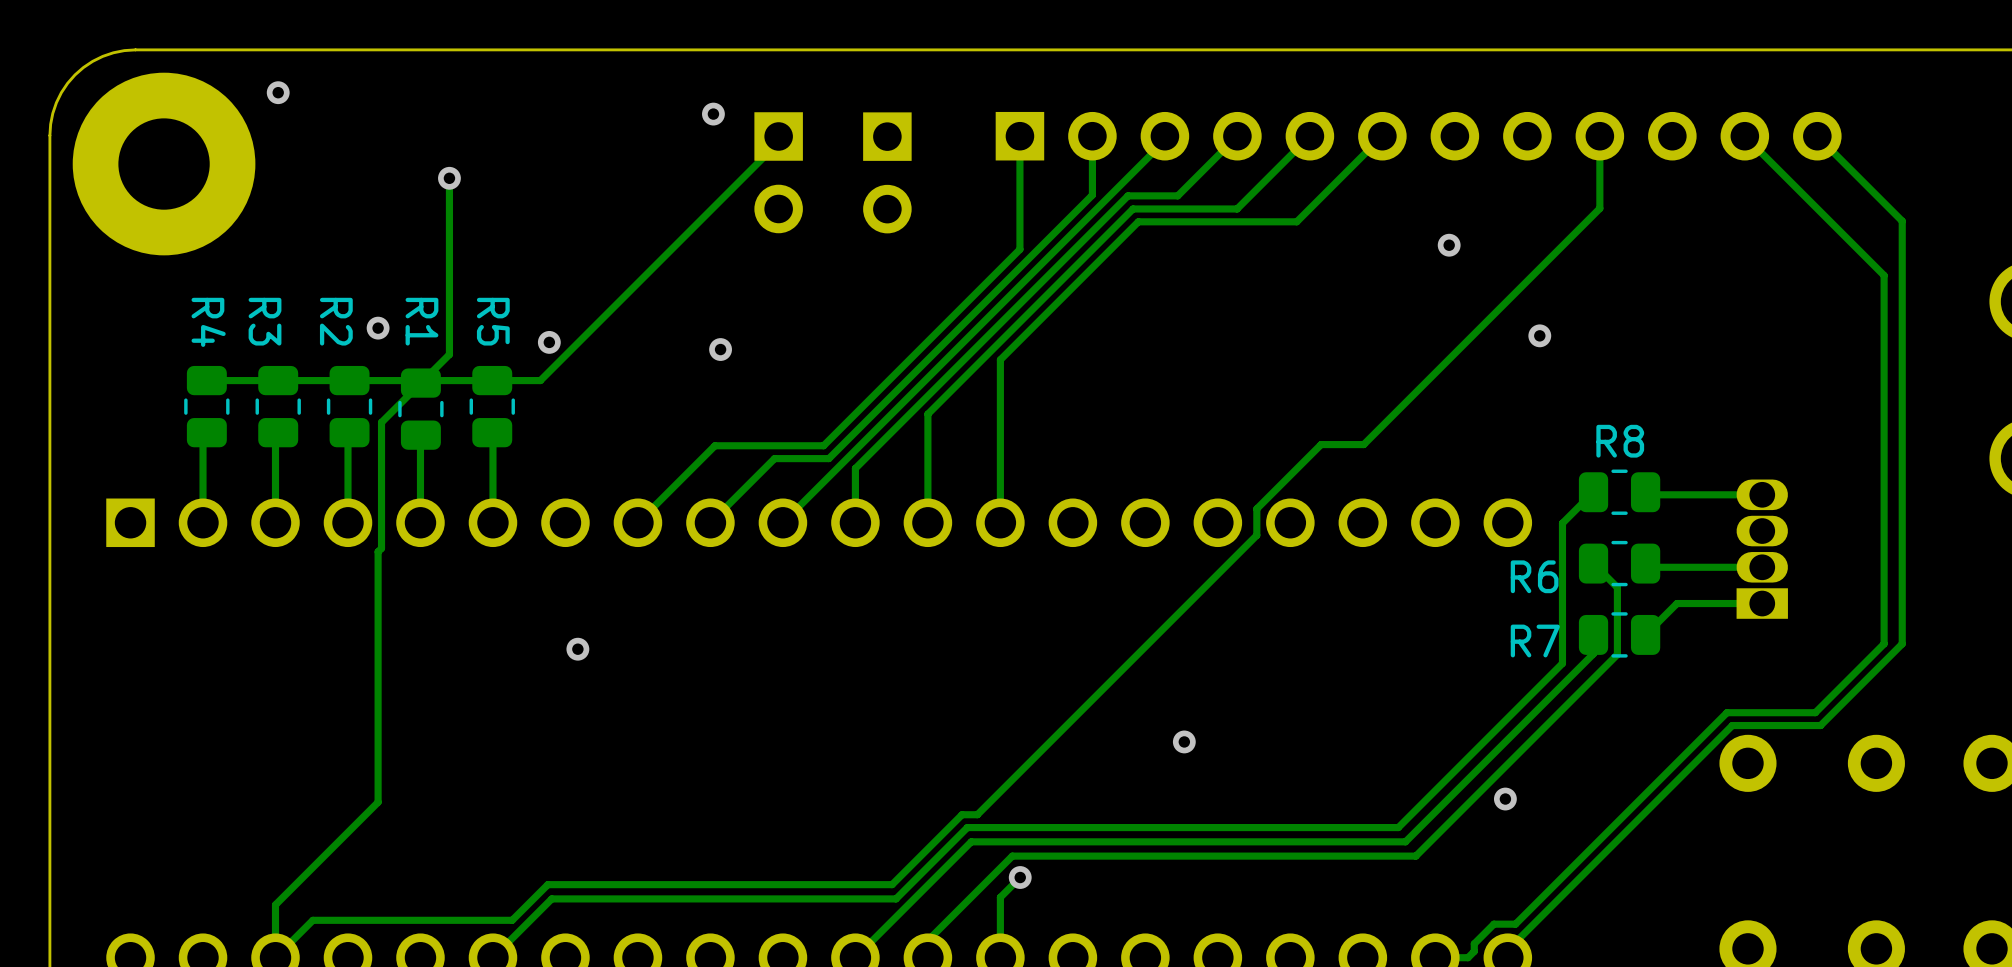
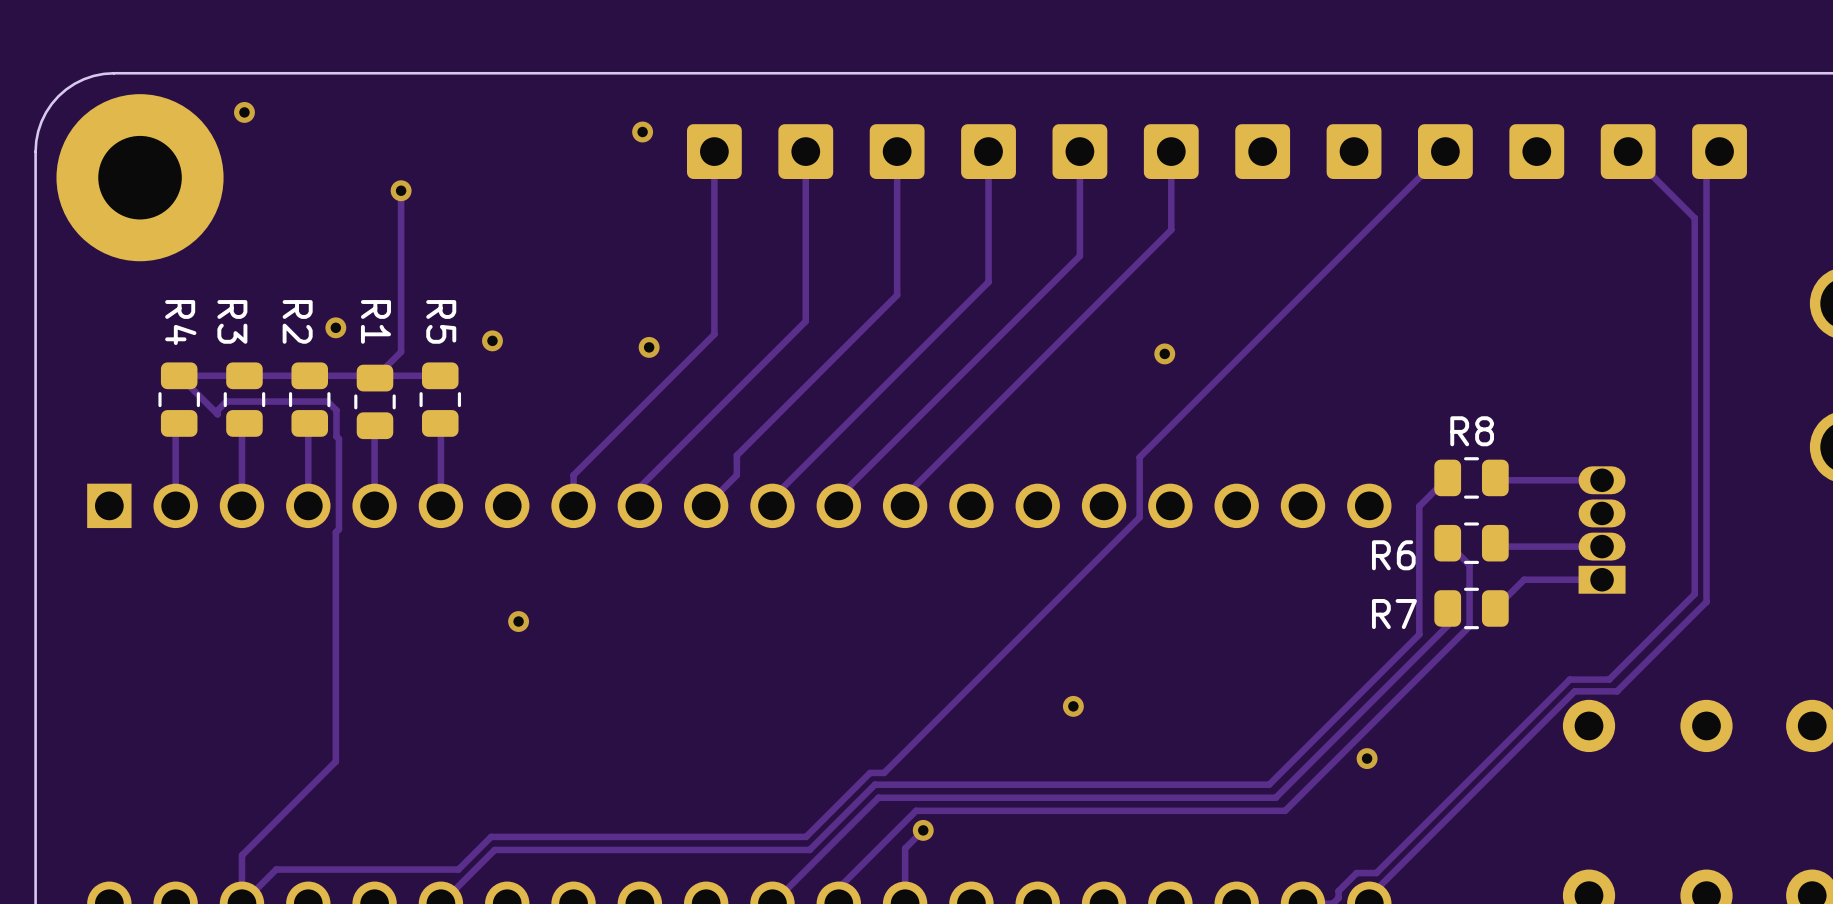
part footprint: [995, 111, 1842, 161] -> [1235, 124, 1291, 180]
part: none -> (714, 151)
track: none -> (805, 151) (805, 321) (639, 487)
part: none -> (805, 151)
part: none -> (897, 151)
part: none -> (988, 151)
part: none -> (1079, 151)
part: none -> (1171, 151)
part: none -> (1354, 151)
part: none -> (1445, 151)
part: none -> (1536, 151)
part: none -> (1628, 151)
part: none -> (1719, 151)
track: (778, 136) (778, 142) (540, 380) (492, 380) -> none
track: (1019, 136) (1019, 249) (823, 445) (714, 445) (637, 522) -> (714, 151) (714, 334) (573, 475) (573, 505)
track: (1092, 136) (1092, 195) (828, 458) (774, 458) (710, 522) -> none
track: (1164, 136) (1164, 140) (816, 489) -> (897, 151) (897, 295) (736, 455) (736, 475)
track: (1309, 136) (1237, 208) (1133, 208) (927, 414) (927, 513) -> (1079, 151) (1079, 256) (838, 497)
track: (1599, 136) (1599, 208) (1363, 444) (1321, 444) (1256, 508) -> (1445, 151) (1139, 457) (1139, 493)
track: (1744, 136) (1884, 275) (1884, 643) (1815, 712) (1770, 712) -> (1628, 151) (1694, 218) (1694, 594) (1609, 679)
track: (1817, 136) (1902, 221) (1902, 643) (1820, 725) (1778, 725) -> (1719, 151) (1706, 164) (1706, 601) (1617, 691)
track: (1237, 140) (1237, 136) (1177, 195) (1127, 195) (855, 468) (855, 514) -> (988, 151) (988, 282) (772, 498)
track: (1382, 140) (1382, 136) (1296, 221) (1138, 221) (1000, 359) (1000, 512) -> (1171, 151) (1171, 229) (905, 496)
part: (778, 172) -> none
part: (887, 172) -> none
via: (1449, 245) -> none
via: (1539, 335) -> none
via: none -> (1164, 353)
track: (420, 383) (381, 422) (381, 449) -> (179, 375) (217, 414) (217, 410) (226, 401) (327, 401) (336, 410) (336, 436) (338, 438)

